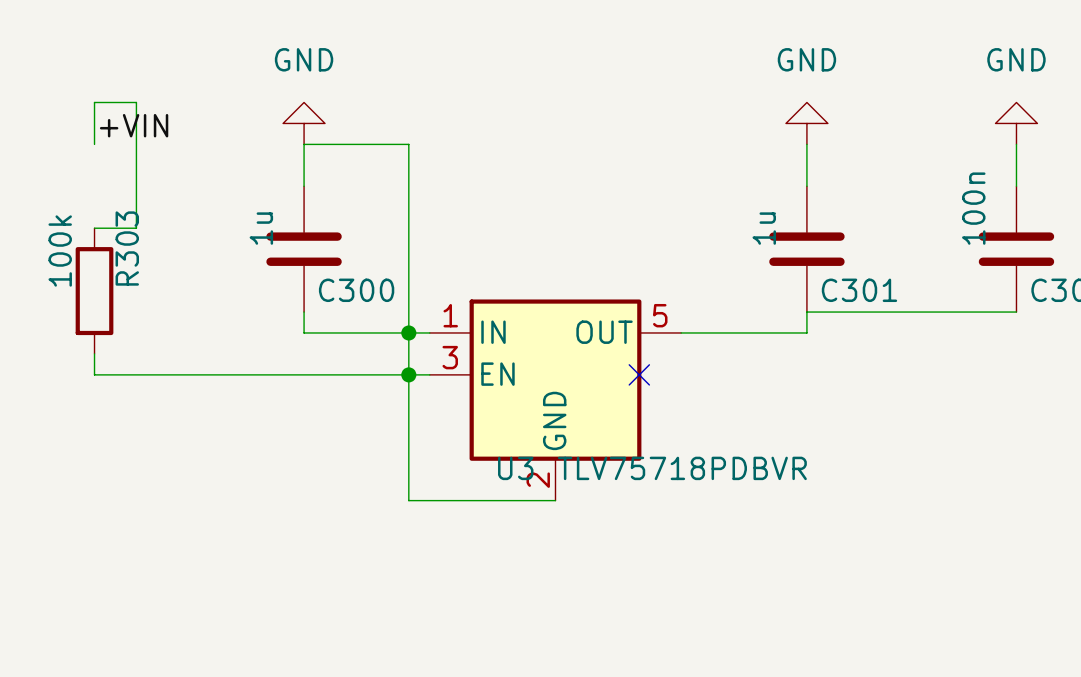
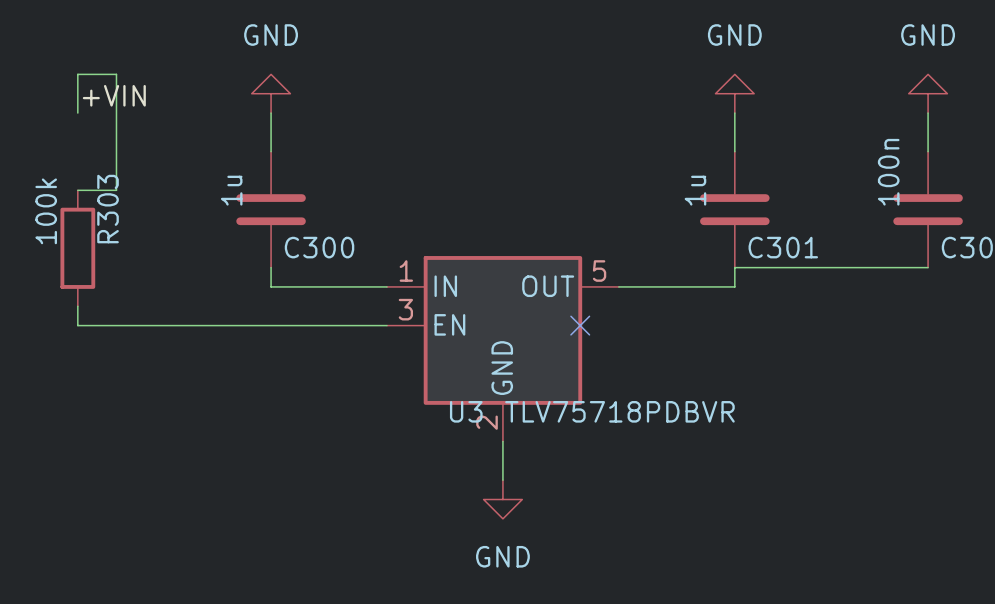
wire: (304, 144) (408, 144) (408, 500) (555, 500) -> (502, 480) (502, 441)
junction: (408, 332) -> none
junction: (408, 374) -> none
power symbol: none -> GND (502, 499)

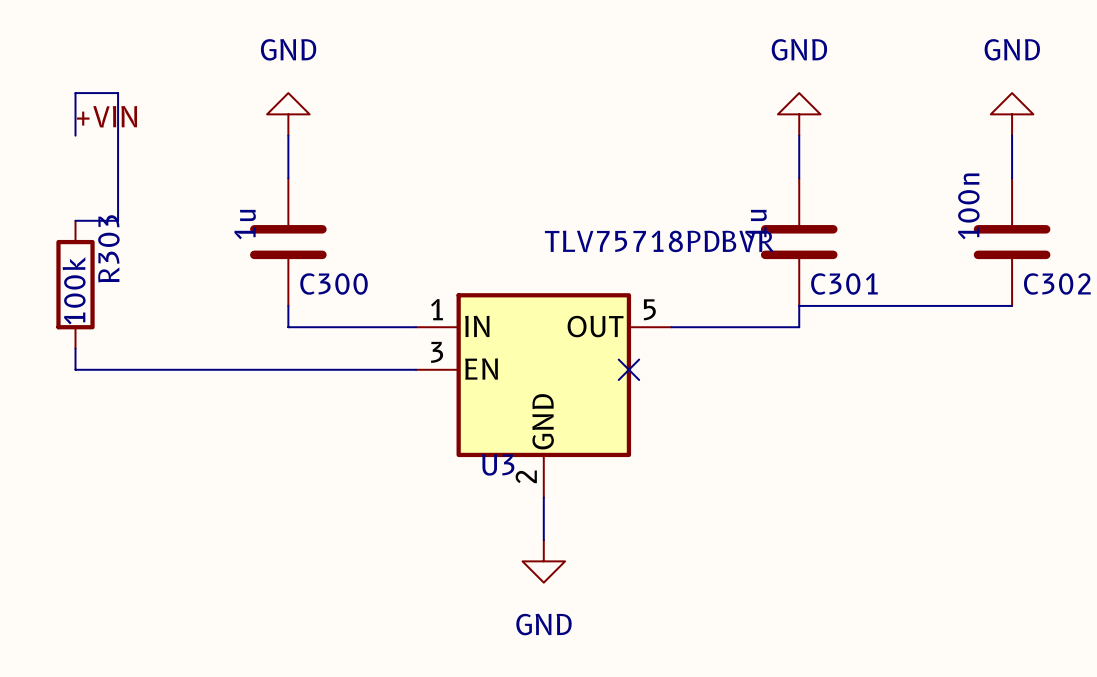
R303 value position: 100k (46, 211) -> 100k (74, 290)
U3 value position: TLV75718PDBVR (619, 411) -> TLV75718PDBVR (659, 241)

